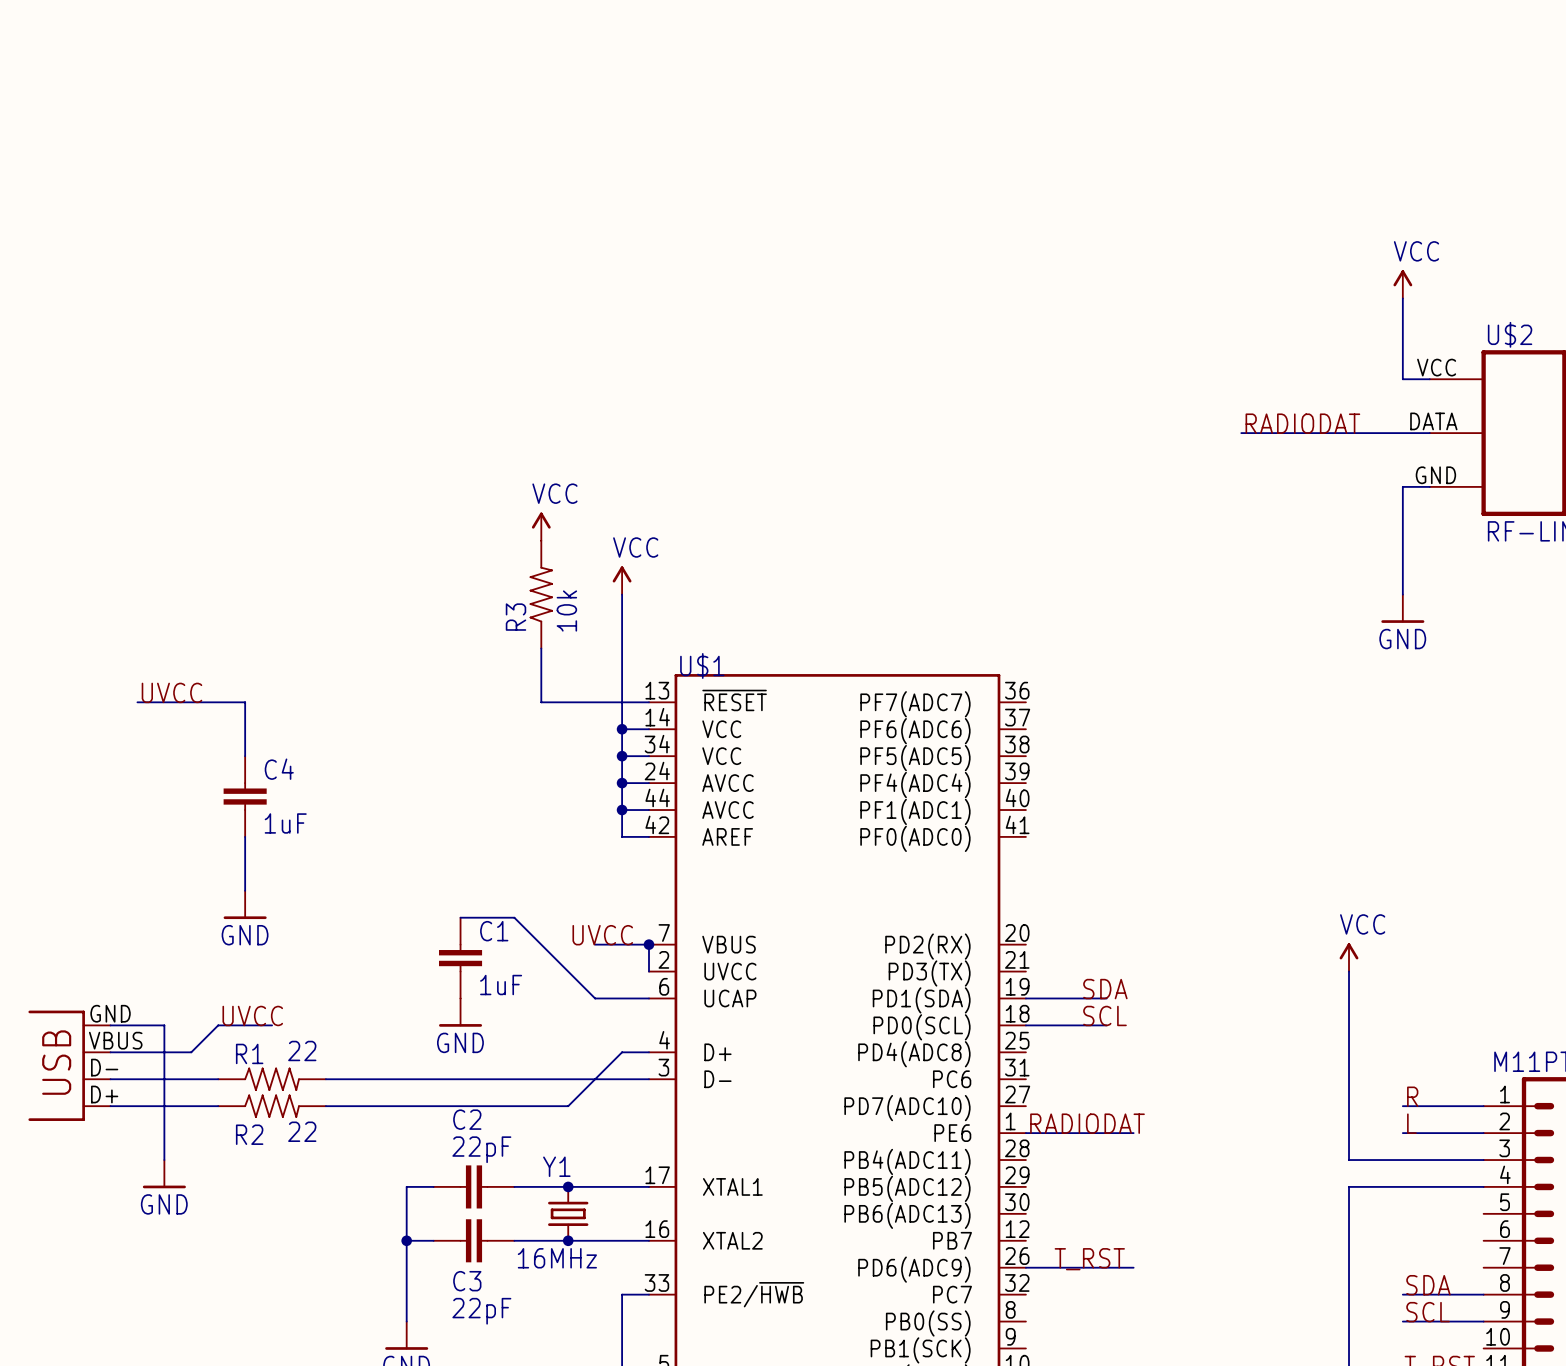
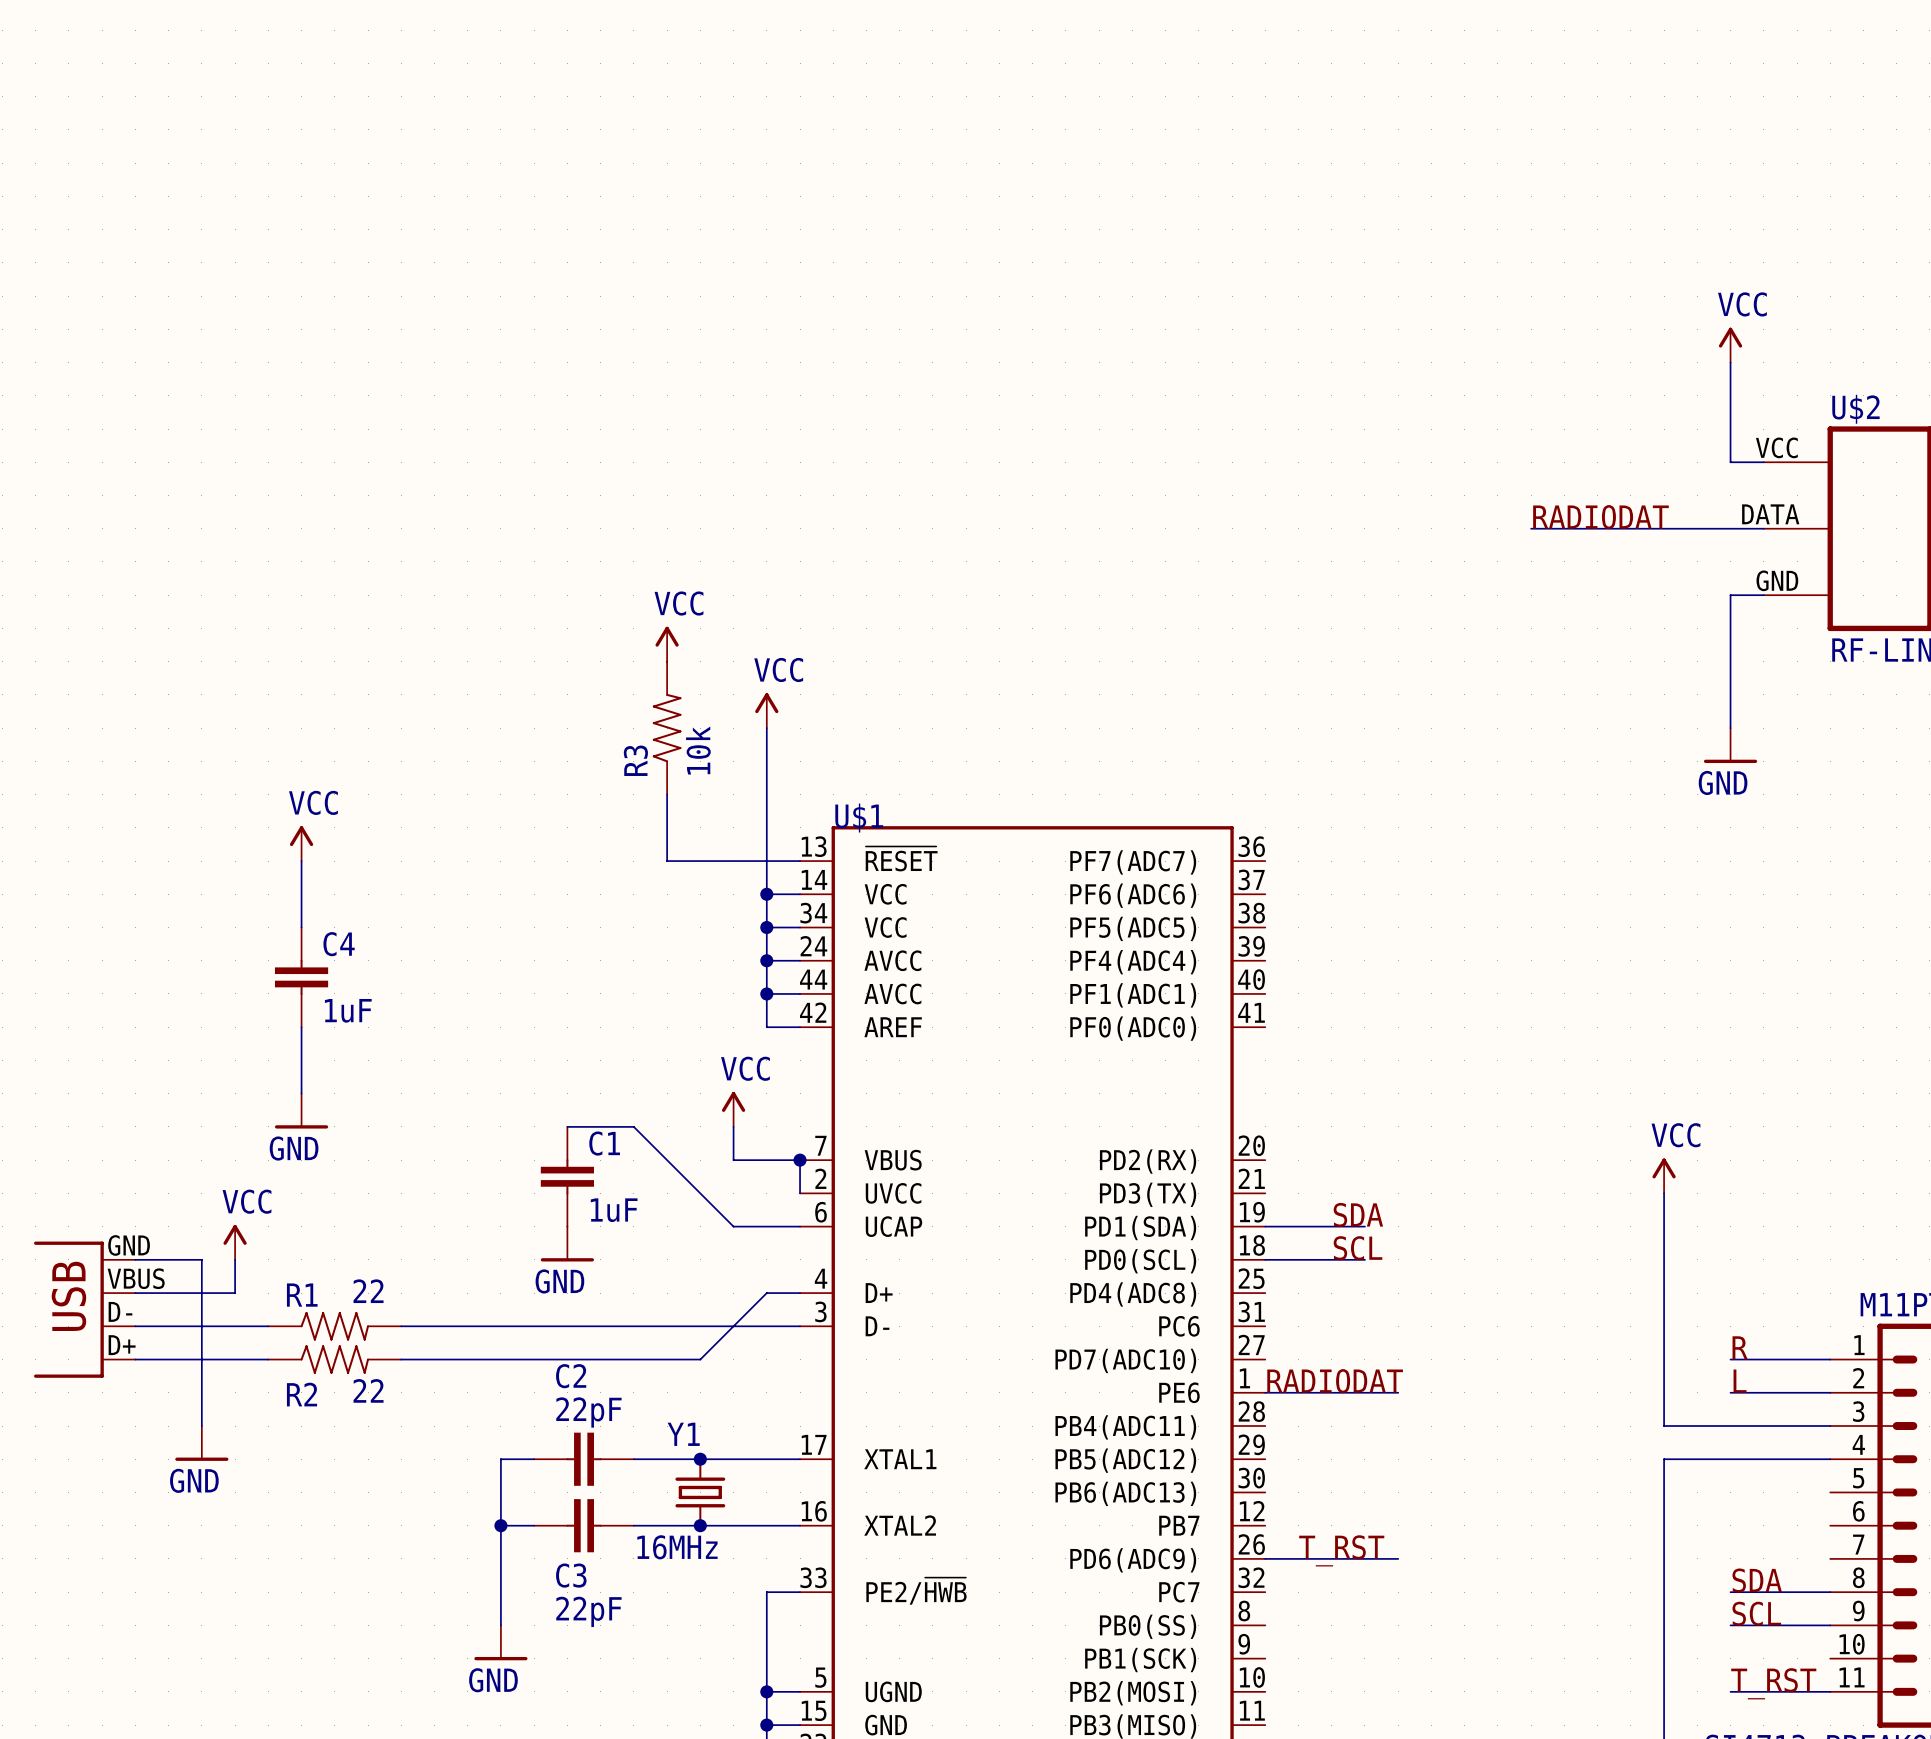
power symbol: none -> VCC (301, 843)
label: UVCC (171, 692) -> none
wire: (137, 702) (245, 702) -> none
power symbol: none -> VCC (733, 1109)
wire: none -> (733, 1126) (733, 1160)
label: UVCC (602, 935) -> none
power symbol: none -> VCC (235, 1242)
label: UVCC (252, 1015) -> none
wire: (272, 1025) (218, 1025) (191, 1052) -> (235, 1259) (235, 1293)

